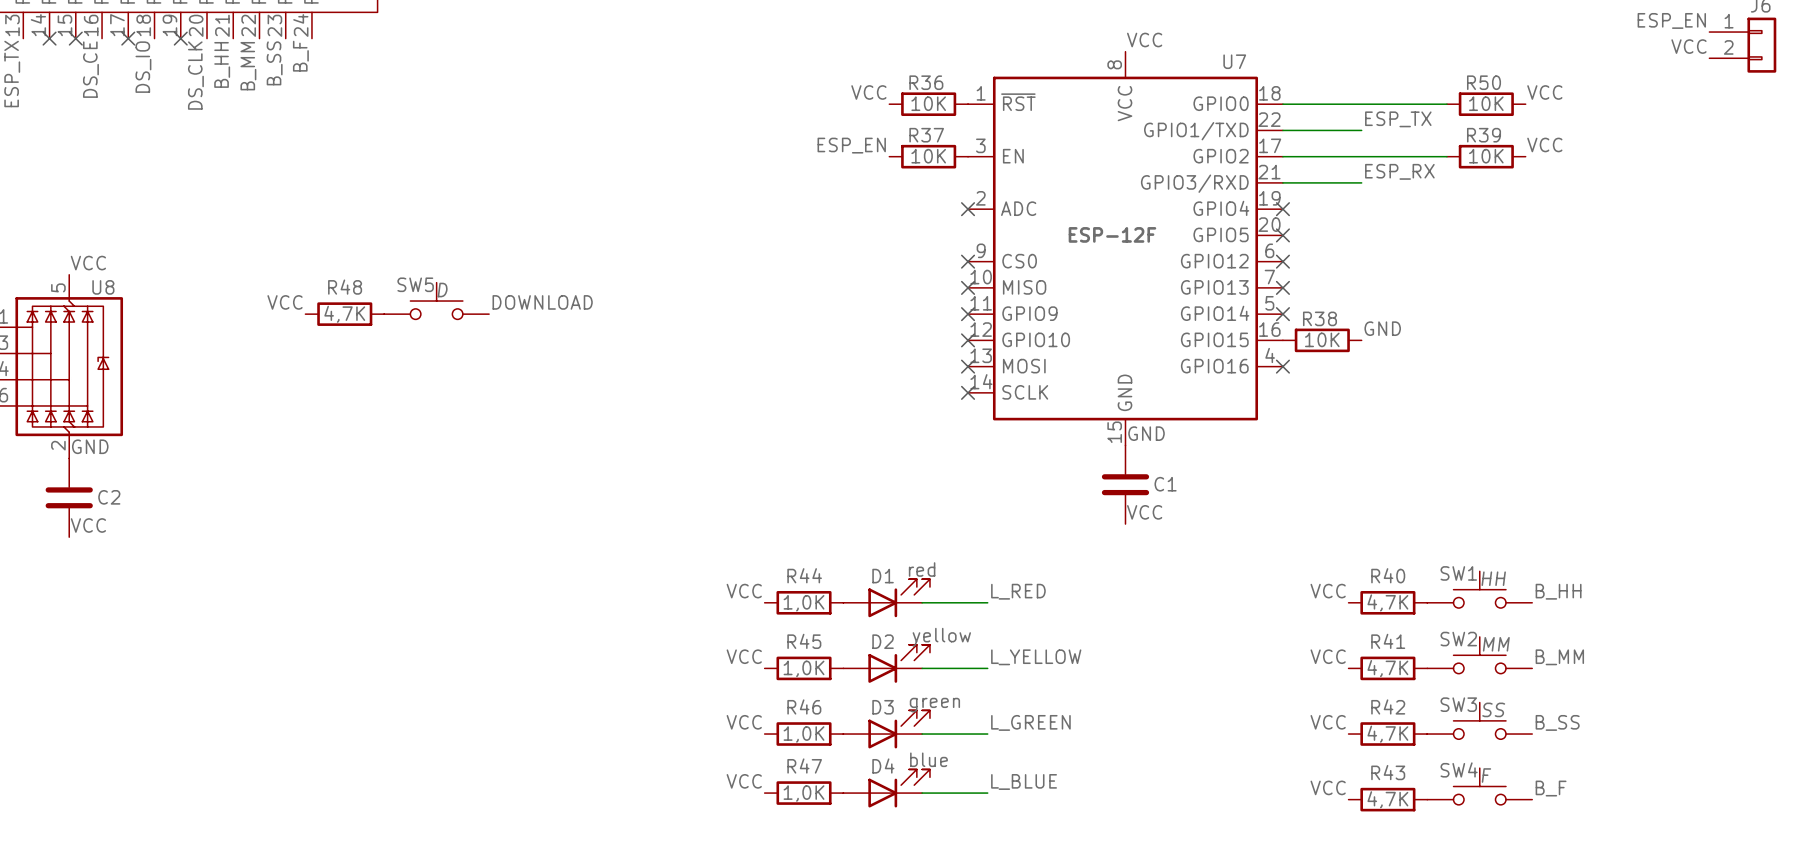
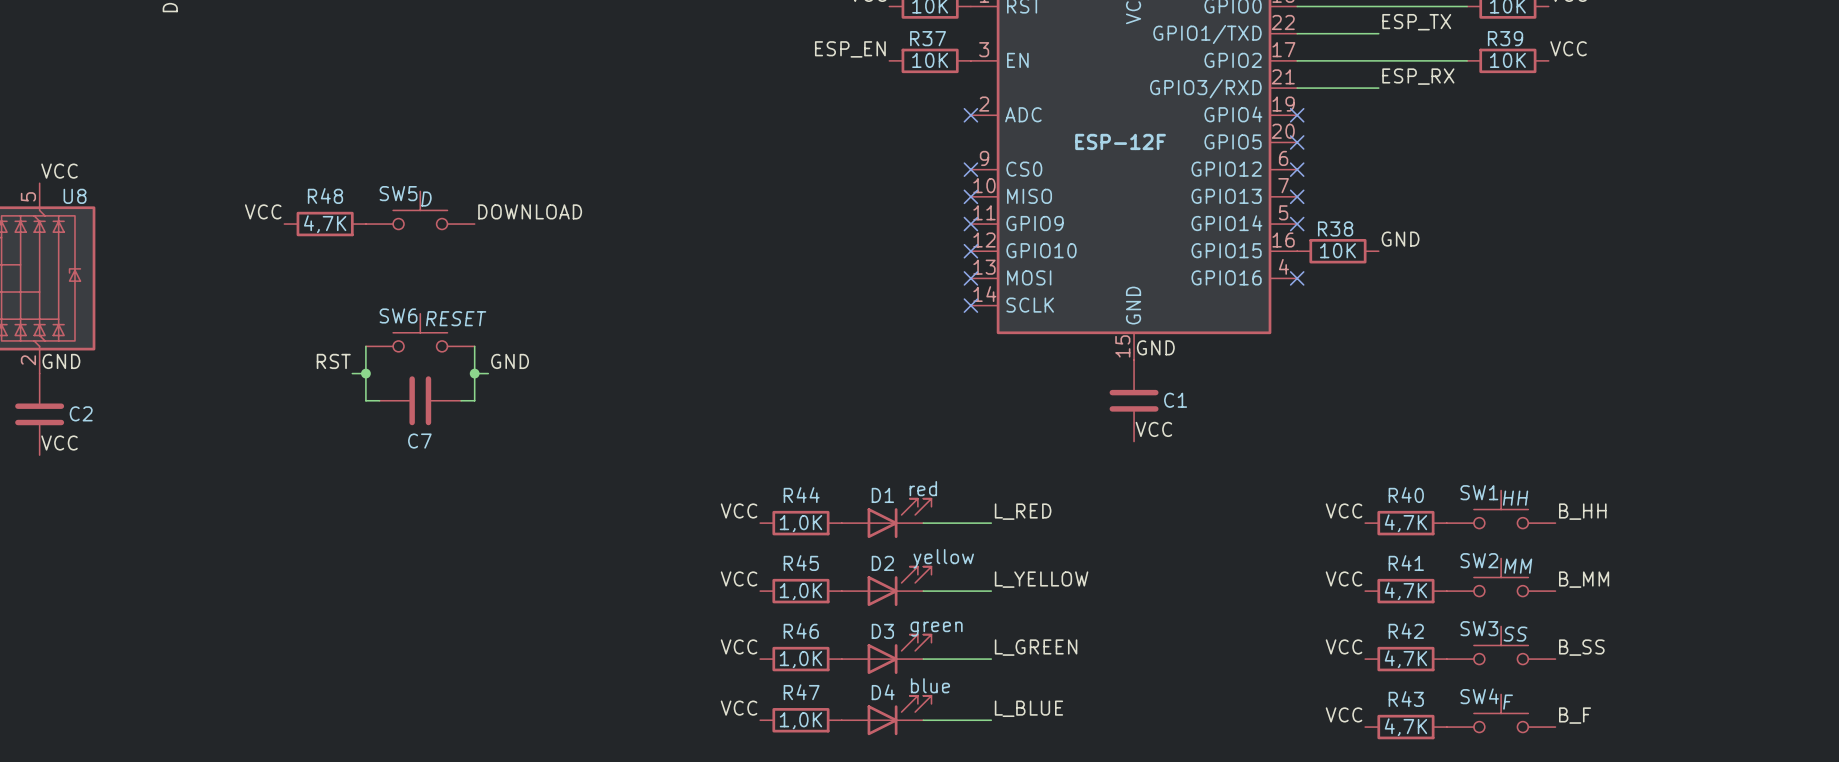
SW6: none -> RESET (420, 332)
wire: none -> (365, 346) (365, 400) (379, 400)
wire: none -> (474, 346) (474, 400) (461, 400)
label: none -> RST (333, 361)
label: none -> GND (510, 361)
wire: none -> (352, 373) (365, 373)
junction: none -> (365, 373)
wire: none -> (474, 373) (488, 373)
junction: none -> (474, 373)
C7: none -> (420, 400)

